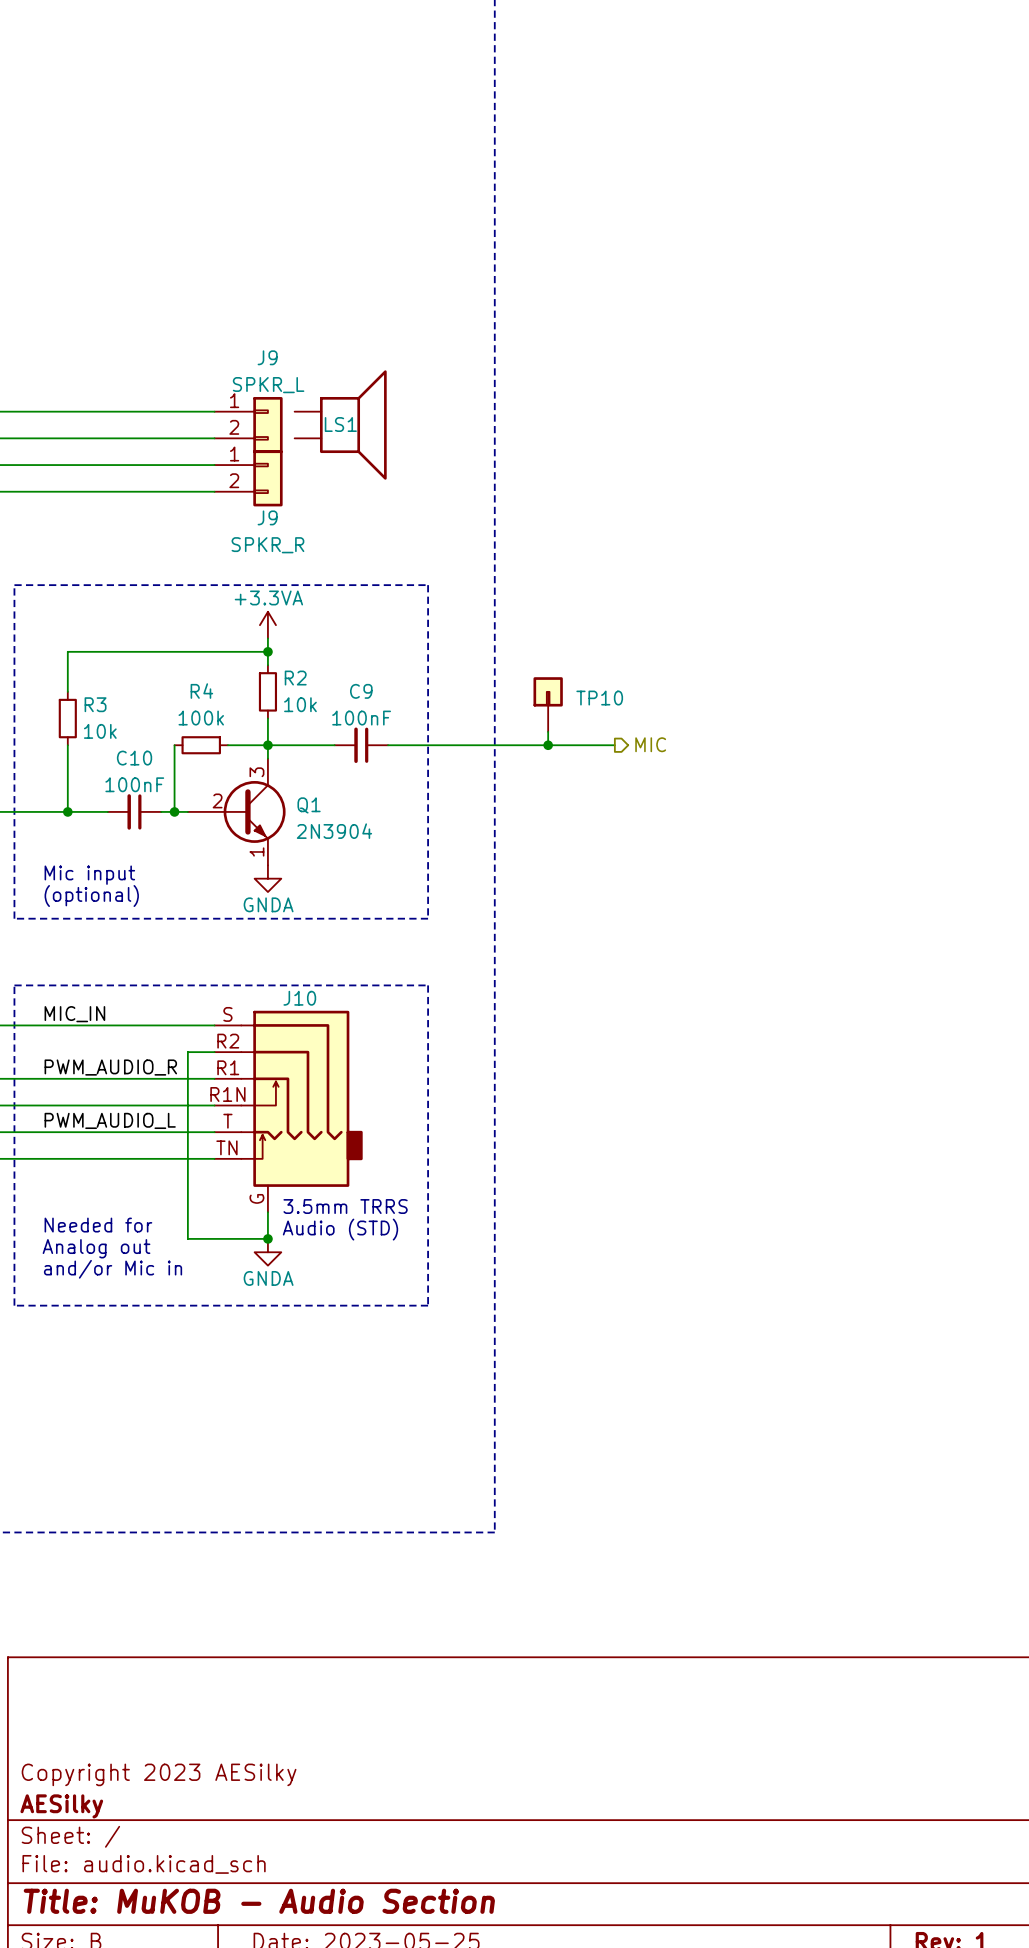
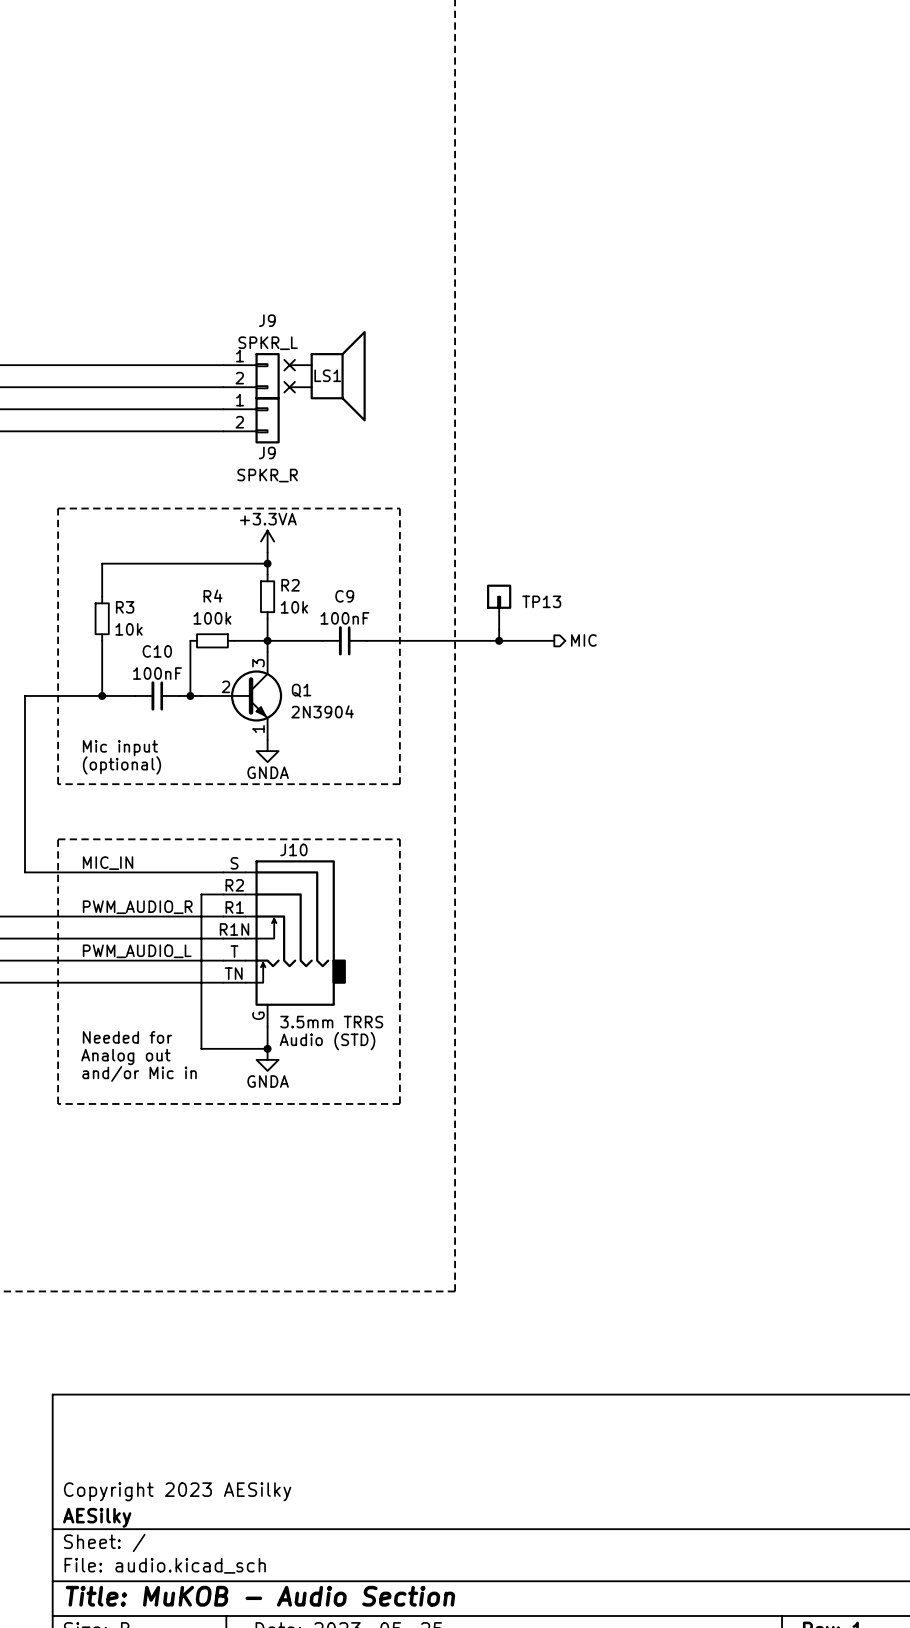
no-connect mark: none -> (289, 365)
no-connect mark: none -> (289, 387)
TP10 name: TP10 (599, 698) -> TP13 (541, 601)

